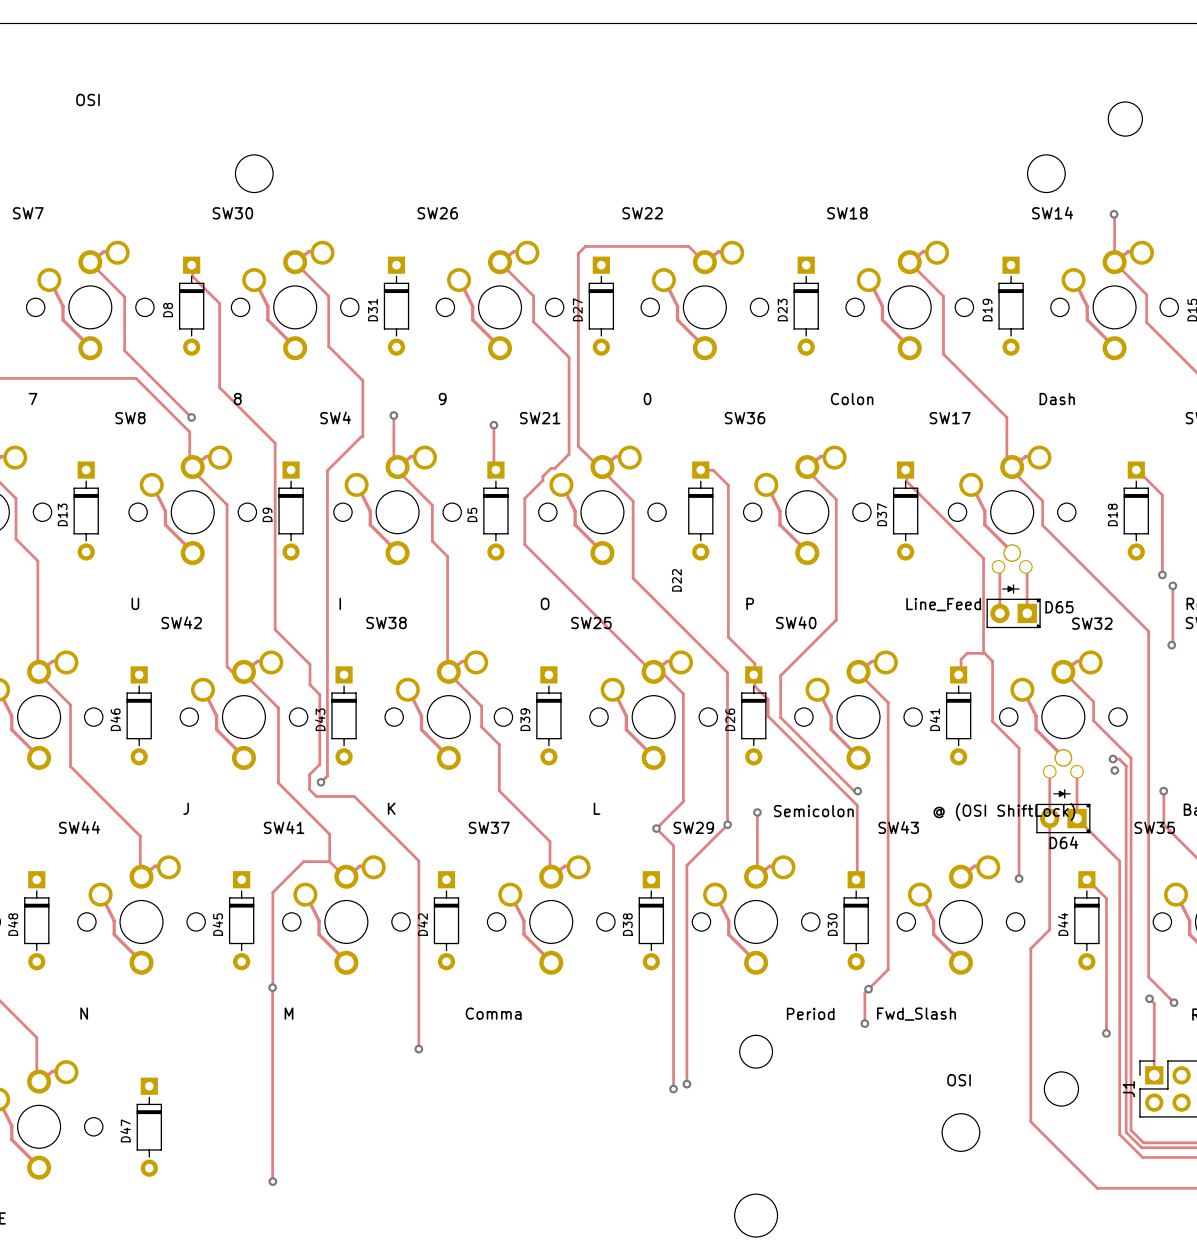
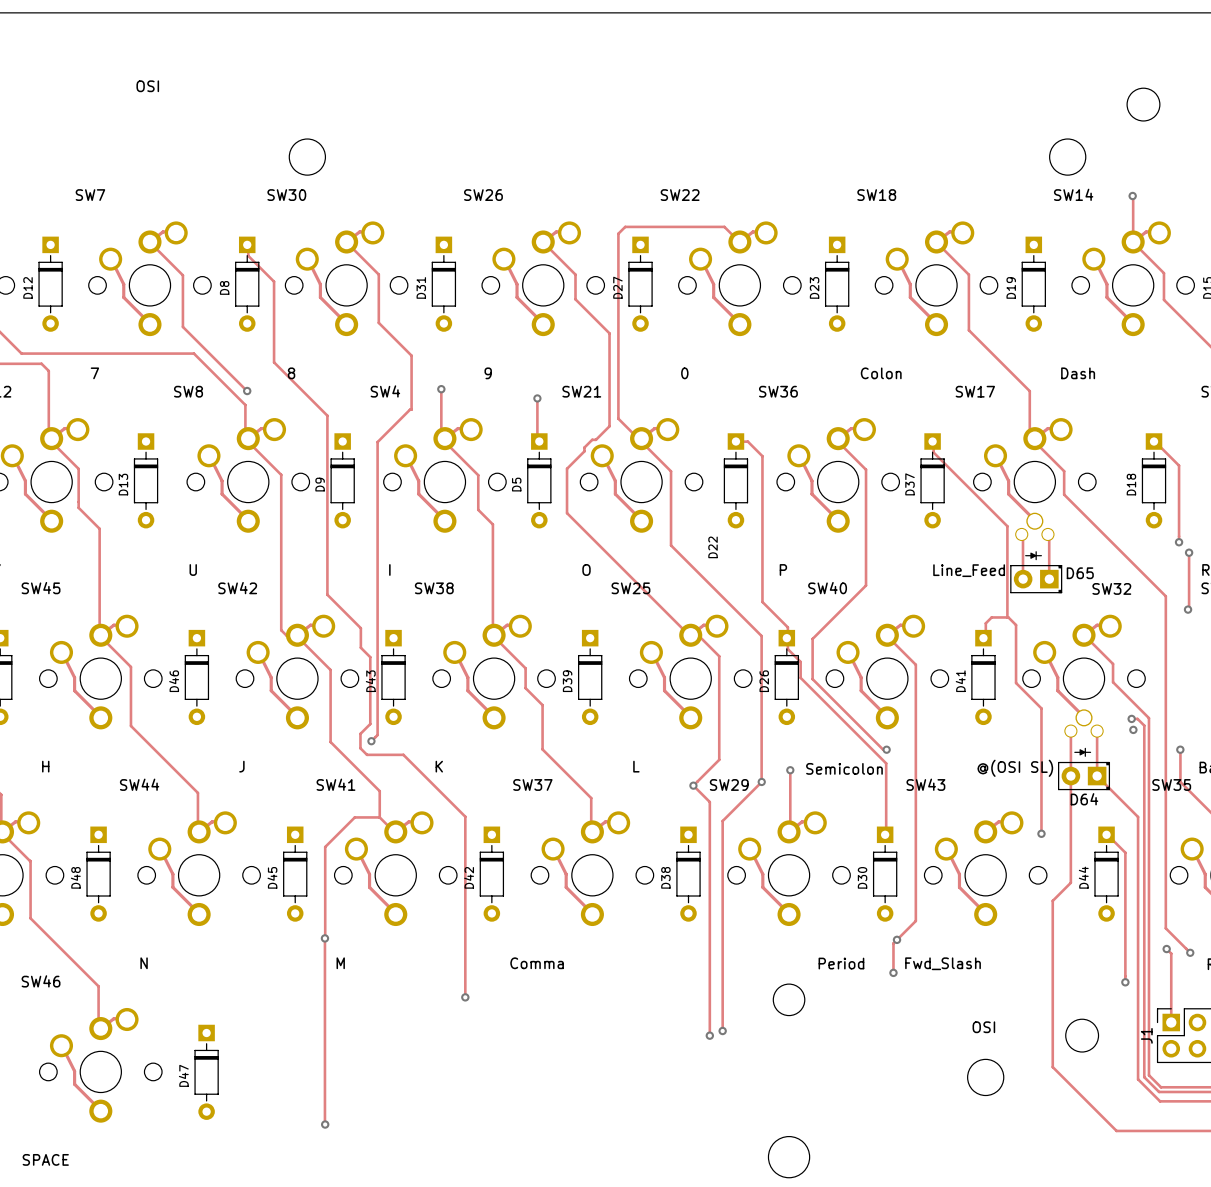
SW32 value: @ (OSI ShiftLock) (1004, 811) -> @(OSI SL) (1015, 768)

